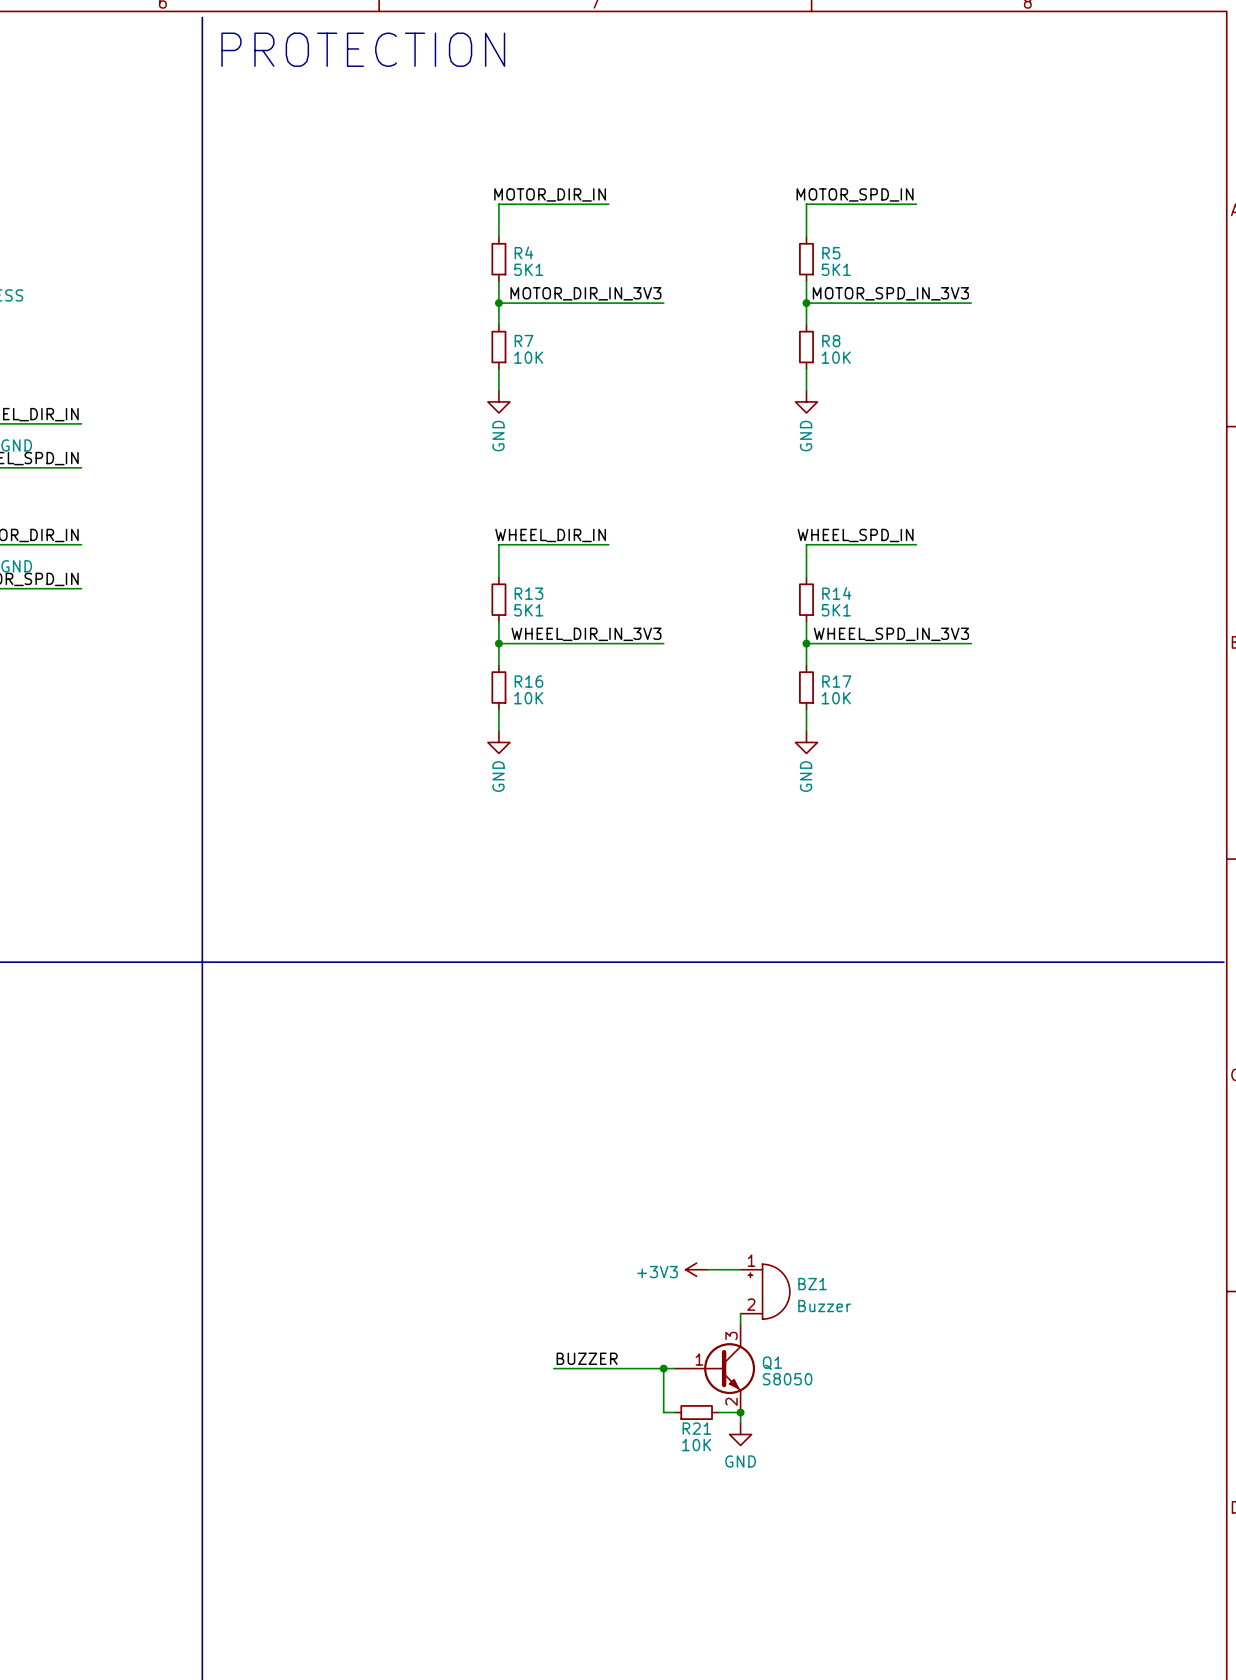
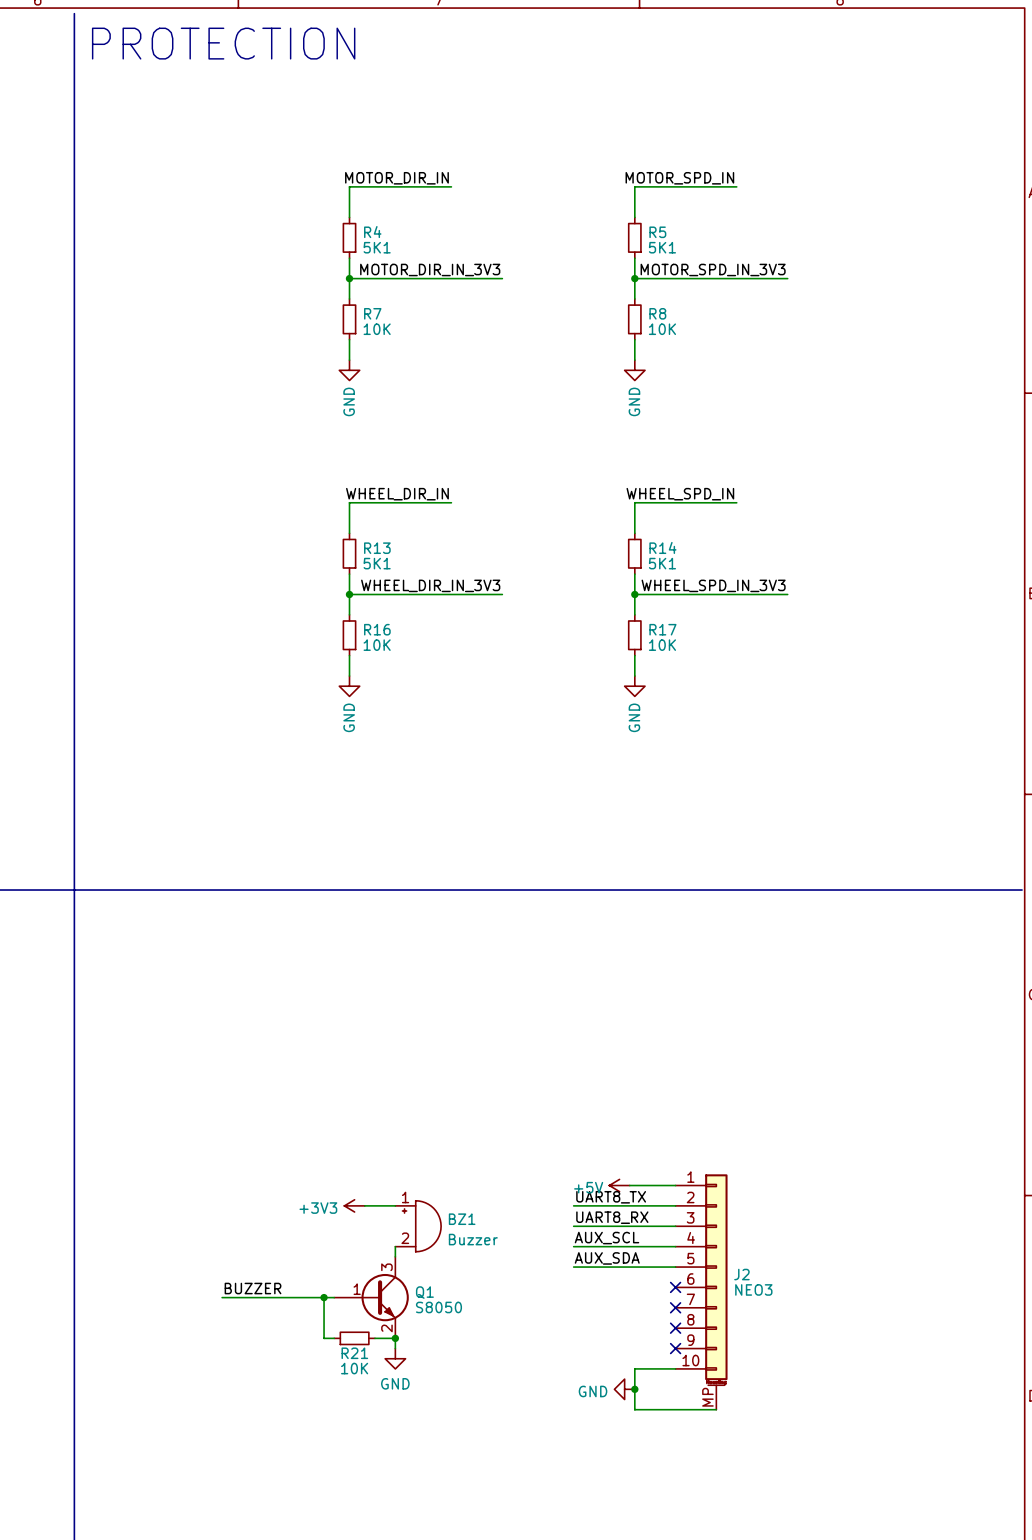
power symbol position: +3V3 (696, 1269) -> +3V3 (354, 1205)
wire: (707, 1269) (740, 1269) -> (364, 1205) (395, 1205)
power symbol: none -> +5V (619, 1185)
wire: none -> (629, 1185) (675, 1185)
BZ1 position: (765, 1291) -> (418, 1226)
label: none -> UART8_TX (611, 1197)
wire: none -> (573, 1205) (675, 1205)
wire: (740, 1313) (740, 1324) -> (675, 1226) (573, 1226)
label: none -> UART8_RX (612, 1217)
label: none -> AUX_SCL (607, 1238)
wire: none -> (395, 1246) (395, 1256)
wire: none -> (573, 1246) (675, 1246)
label position: BUZZER (587, 1358) -> BUZZER (253, 1288)
label: none -> AUX_SDA (607, 1258)
wire: (553, 1368) (674, 1368) -> (222, 1297) (334, 1297)
wire: (663, 1368) (663, 1412) (674, 1412) -> (324, 1297) (324, 1338) (334, 1338)
junction: (663, 1368) -> none
Q1 position: (714, 1368) -> (371, 1297)
wire: none -> (573, 1267) (675, 1267)
no-connect mark: none -> (675, 1287)
J2: none -> NEO3 (701, 1292)
junction: none -> (324, 1297)
R21 position: (696, 1412) -> (354, 1338)
wire: (718, 1412) (740, 1412) (740, 1423) -> (374, 1338) (395, 1338) (395, 1348)
junction: (740, 1412) -> none
no-connect mark: none -> (675, 1307)
power symbol rotation: 0° (740, 1434) -> 90° clockwise (624, 1389)
power symbol position: GND (740, 1434) -> GND (624, 1389)
no-connect mark: none -> (675, 1328)
junction: none -> (395, 1338)
no-connect mark: none -> (675, 1348)
power symbol: none -> GND (395, 1358)
wire: none -> (675, 1368) (634, 1368) (634, 1409) (716, 1409)
junction: none -> (634, 1389)

